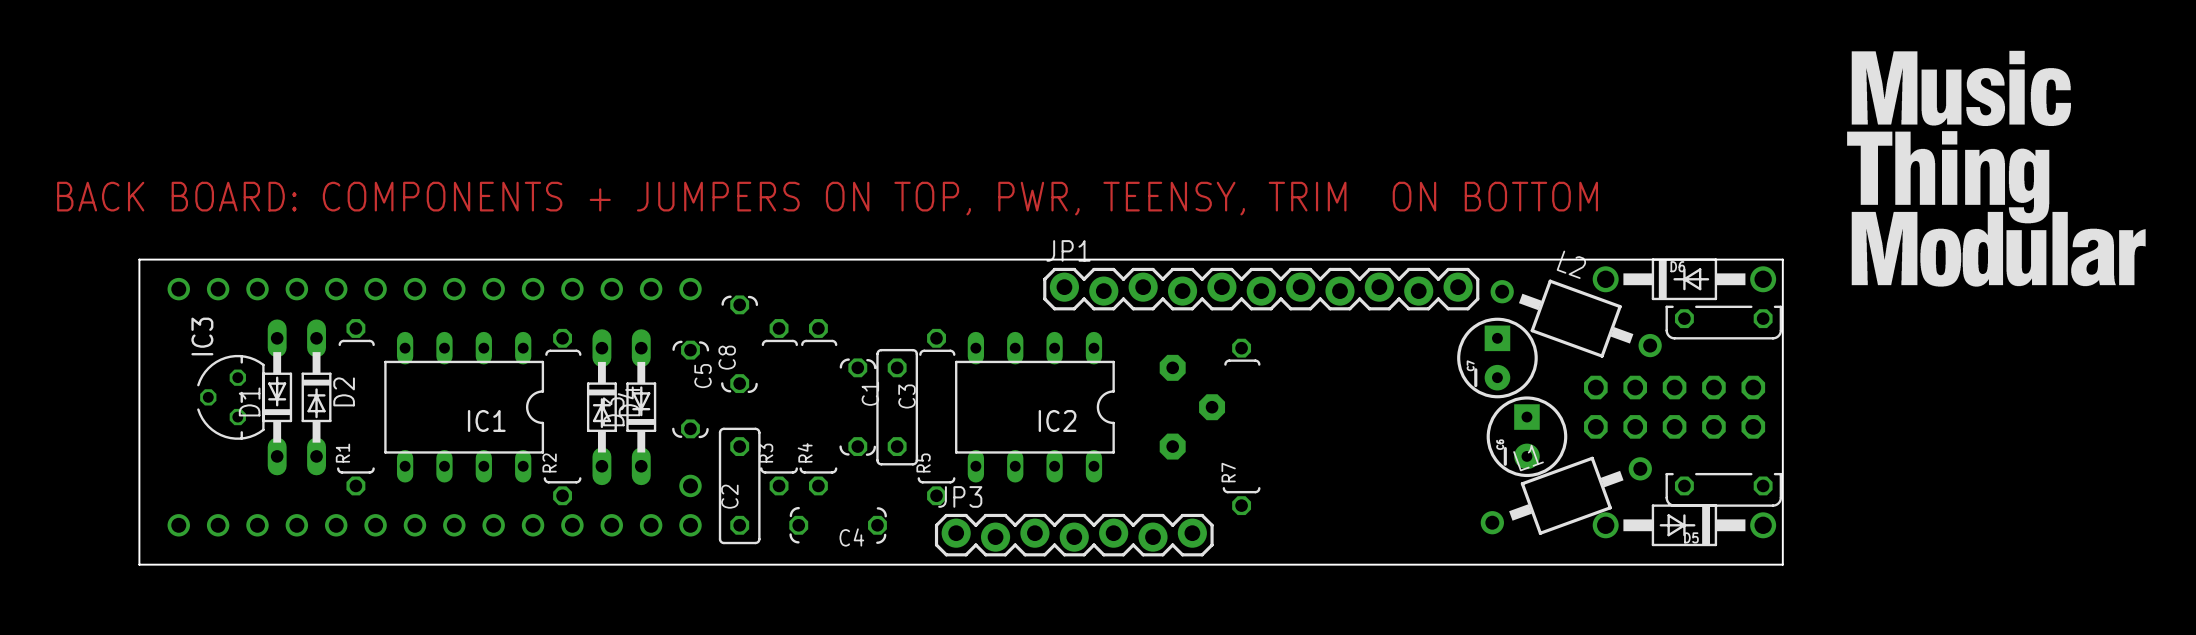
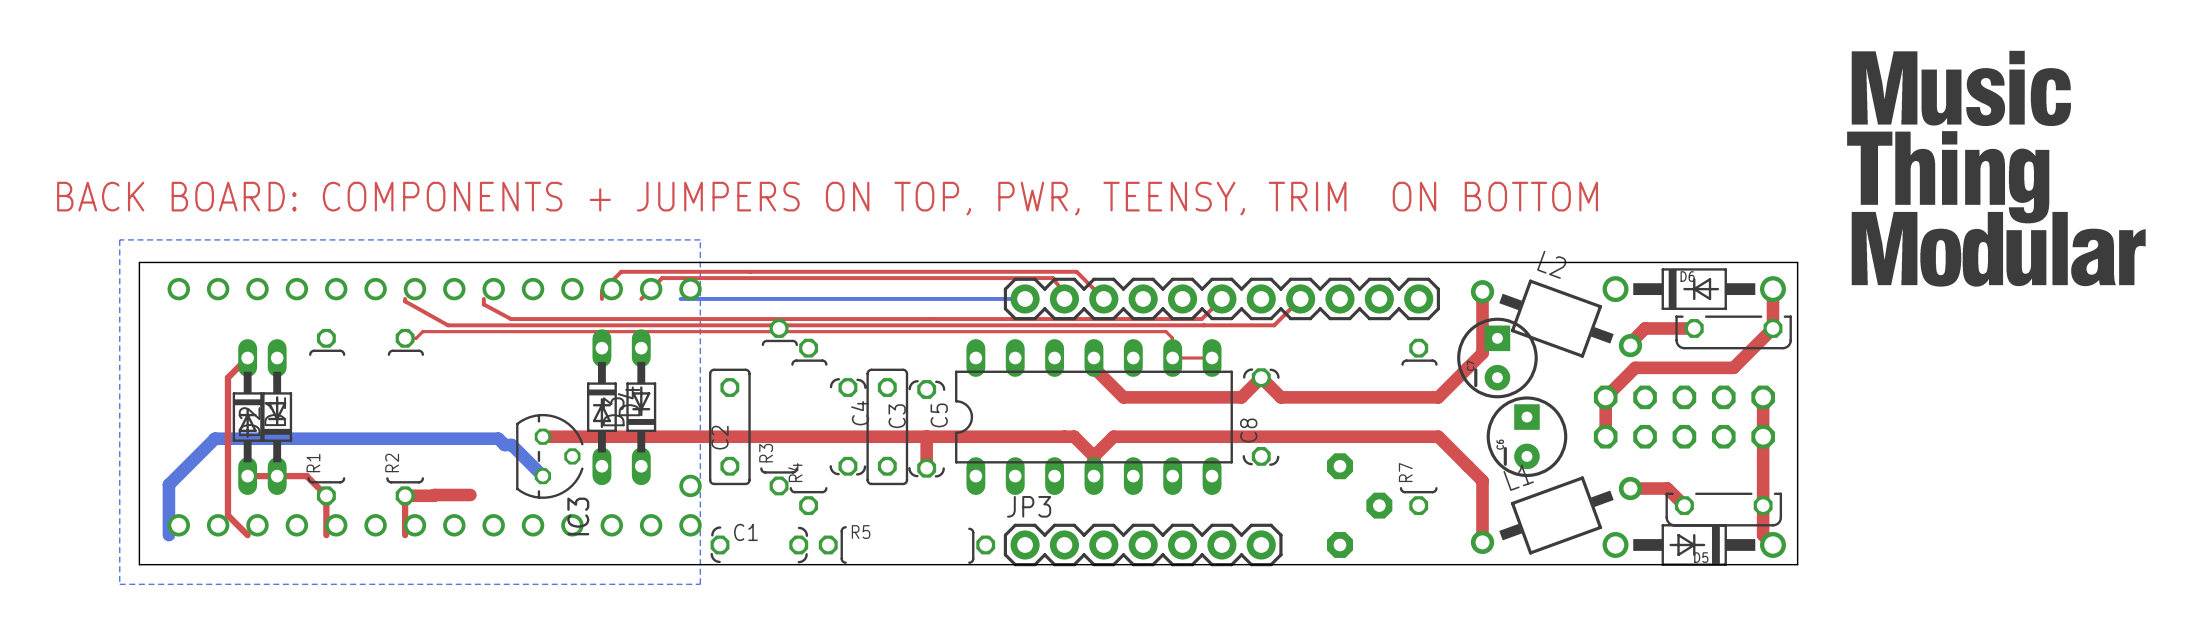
bottom zone outline: none -> (119, 239) (700, 239) (700, 584) (119, 584) (119, 239)
board edge: (139, 262) (139, 259) (1782, 259) (1782, 564) -> (139, 262) (1797, 262) (1797, 564) (1782, 564)
D6 position: (1684, 279) -> (1694, 289)
JP1: (1261, 289) -> none
top track: none -> (1772, 289) (1772, 328) (1733, 367) (1635, 367) (1605, 397) (1605, 436)
top track: none -> (1482, 291) (1482, 353) (1438, 397) (1280, 397) (1261, 377) (1241, 397) (1123, 397) (1093, 367) (1093, 358)
top track: none -> (405, 298) (405, 301) (448, 325) (1274, 325) (1300, 298)
top track: none -> (483, 298) (483, 304) (510, 319) (1201, 319) (1221, 298)
top track: none -> (601, 298) (601, 291) (621, 271) (1076, 271) (1103, 298)
top track: none -> (641, 298) (662, 278) (1052, 278) (1064, 293) (1064, 298)
bottom track: none -> (680, 298) (1025, 298)
part: none -> (1221, 298)
L2 position: (1576, 318) -> (1556, 318)
part position: (1723, 322) -> (1733, 332)
top track: none -> (1694, 328) (1645, 328) (1630, 343) (1630, 345)
top track: none -> (405, 338) (416, 338) (422, 331) (1166, 331) (1172, 337) (1172, 358) (1212, 358)
C8 position: (739, 344) -> (1261, 417)
top track: none -> (247, 358) (227, 377) (227, 515) (247, 535)
C5 position: (690, 389) -> (926, 428)
IC3 rotation: 0° (230, 397) -> 180° (549, 456)
IC3 position: (230, 397) -> (549, 456)
D1 rotation: 0° (277, 397) -> 180° (247, 417)
D2 rotation: 0° (316, 397) -> 180° (277, 417)
top track: none -> (1763, 397) (1763, 535) (1772, 544)
R1 position: (355, 407) -> (326, 417)
IC1: (464, 407) -> none
R4 position: (818, 407) -> (808, 426)
C1 rotation: 0° (857, 407) -> 90° clockwise (759, 544)
C1 position: (857, 407) -> (759, 544)
C3 position: (897, 407) -> (887, 426)
IC2: (1034, 407) -> none
part position: (1192, 407) -> (1359, 505)
part position: (1674, 407) -> (1684, 417)
R2 position: (562, 417) -> (405, 417)
R5 rotation: 0° (936, 417) -> 90° clockwise (906, 544)
R5 position: (936, 417) -> (906, 544)
part: none -> (1093, 417)
R7 position: (1241, 426) -> (1418, 426)
top track: none -> (542, 436) (1074, 436) (1093, 456)
top track: none -> (926, 436) (926, 468)
top track: none -> (1093, 456) (1113, 436) (1438, 436) (1482, 480) (1482, 542)
top track: none -> (247, 476) (306, 476) (326, 495) (326, 535)
bottom track: none -> (542, 476) (511, 445) (504, 445) (498, 438) (214, 438) (168, 484) (168, 535)
C2 position: (739, 485) -> (729, 426)
top track: none -> (1630, 488) (1667, 488) (1684, 505)
part position: (1723, 489) -> (1723, 509)
top track: none -> (470, 494) (405, 495) (405, 535)
L1 position: (1566, 495) -> (1556, 515)
JP3 footprint: [934, 513, 1214, 557] -> [1003, 523, 1283, 567]
C4 rotation: 0° (838, 525) -> 90° clockwise (848, 426)
C4 position: (838, 525) -> (848, 426)
D5 position: (1684, 525) -> (1694, 544)

